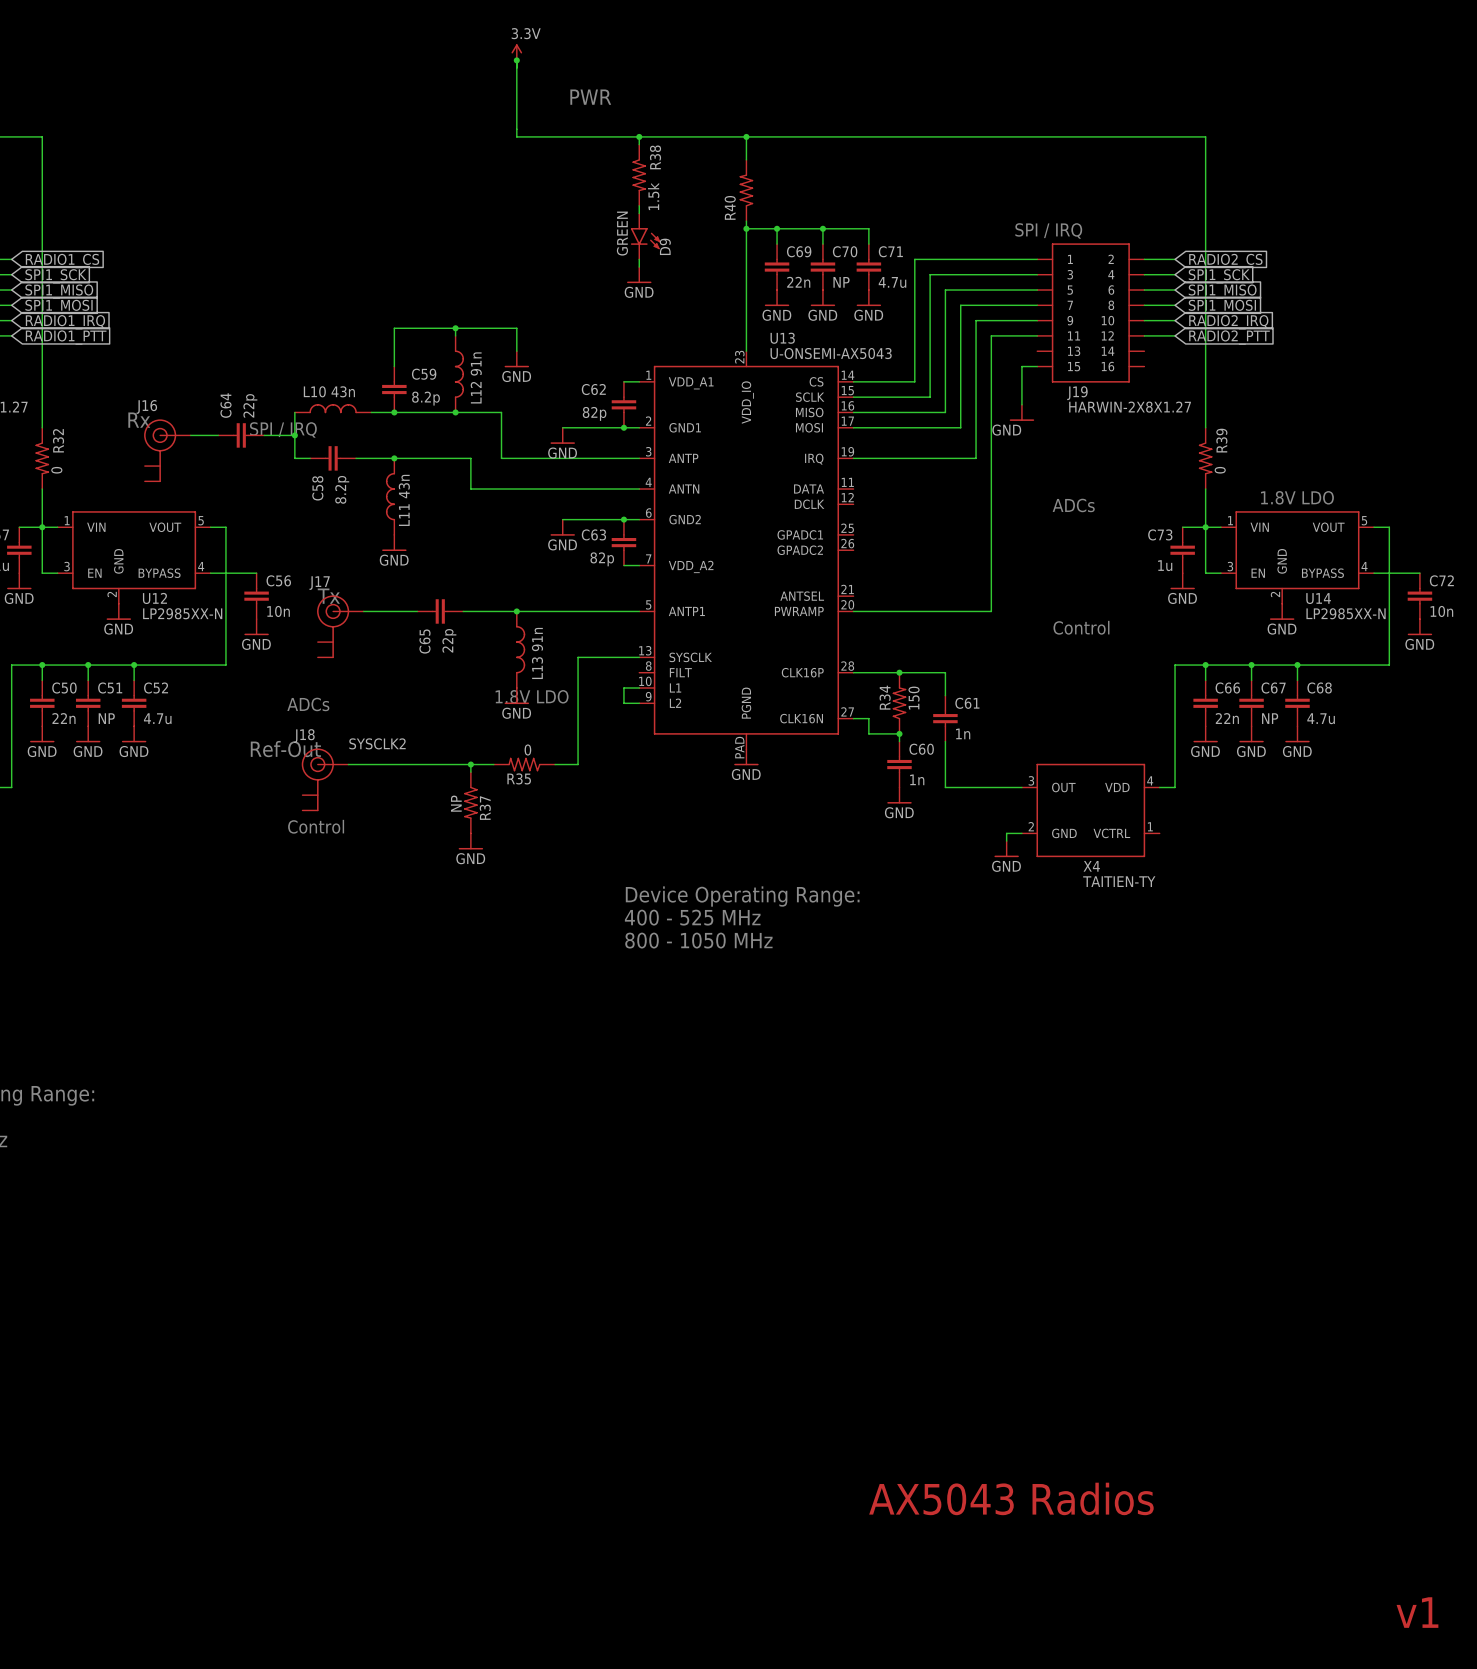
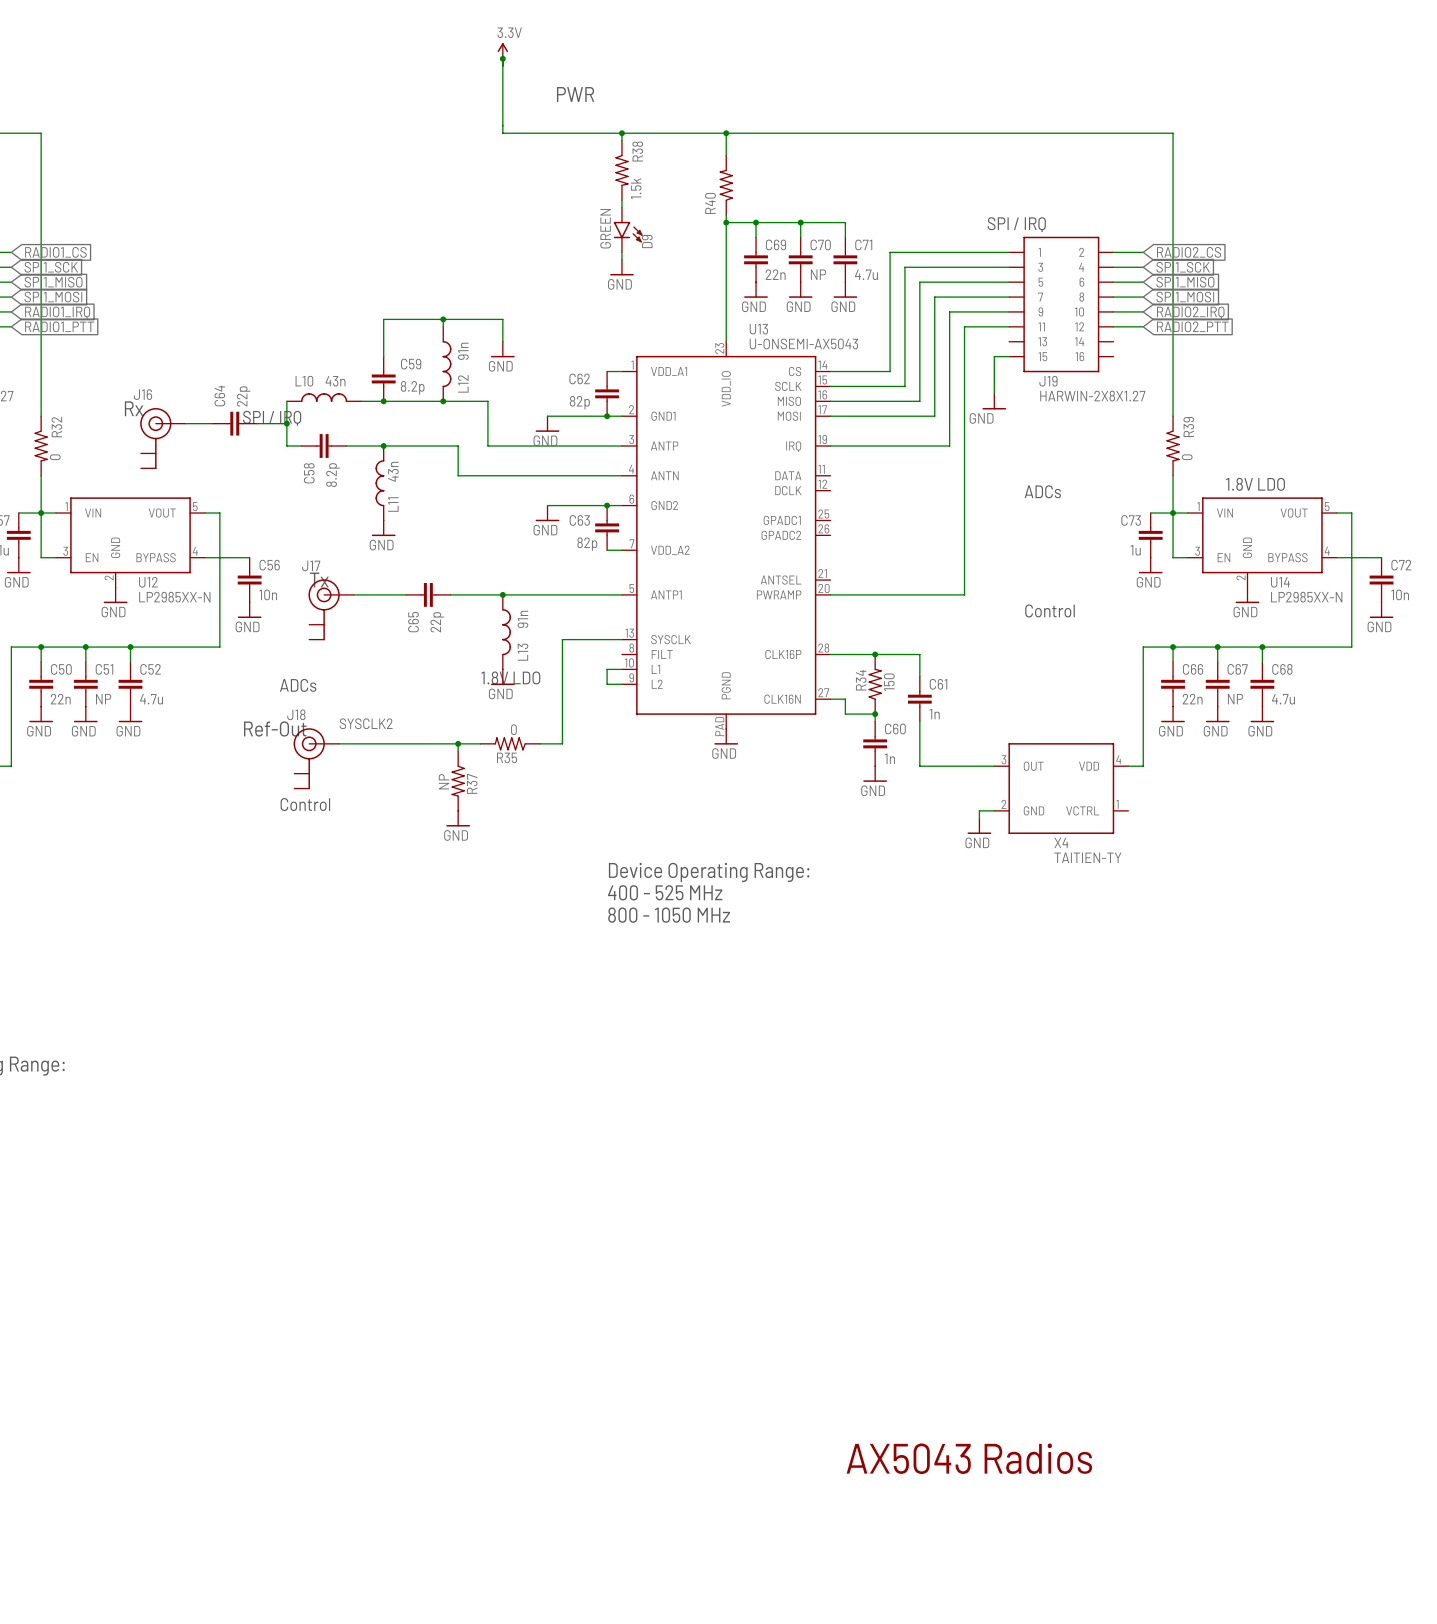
text: v1 (1417, 1612) -> none

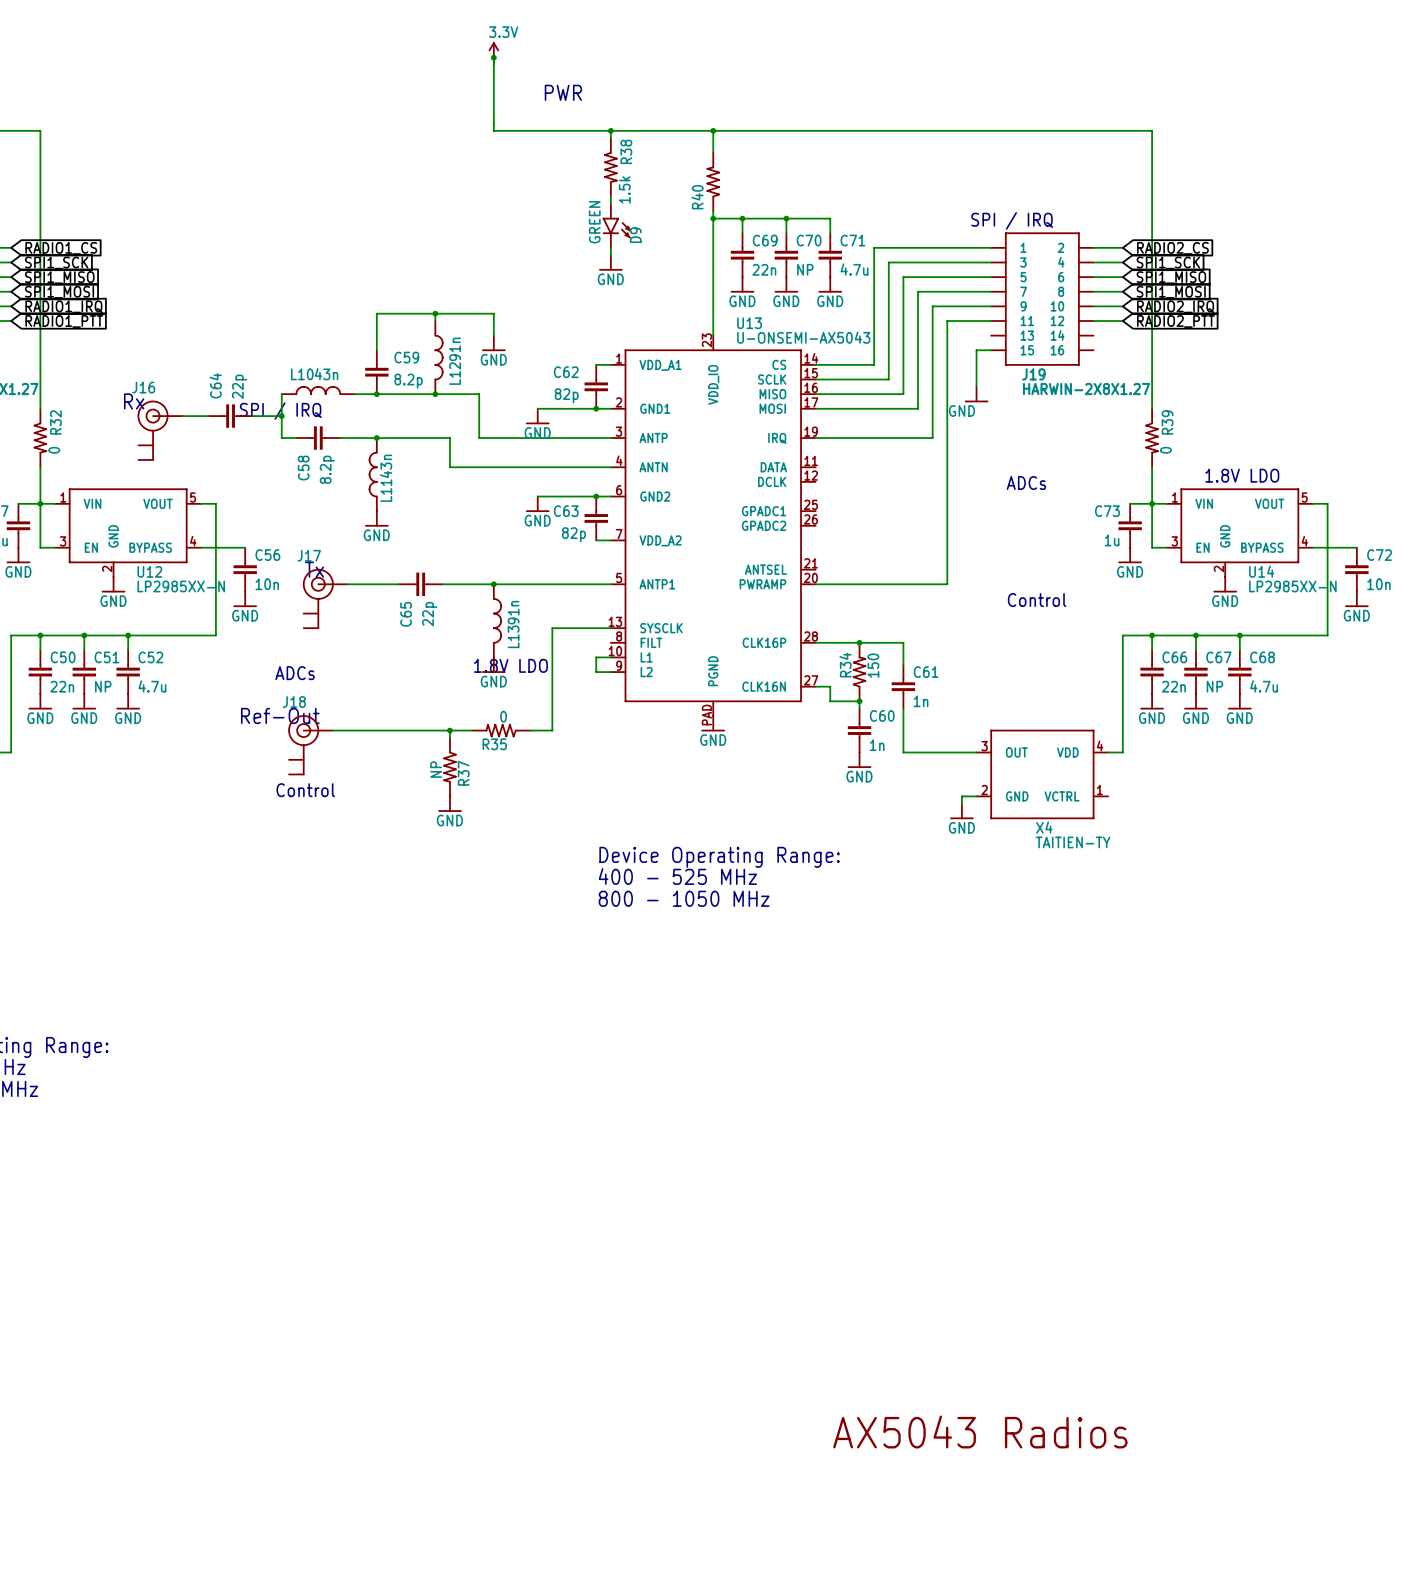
label: SYSCLK2 (366, 723) -> none

